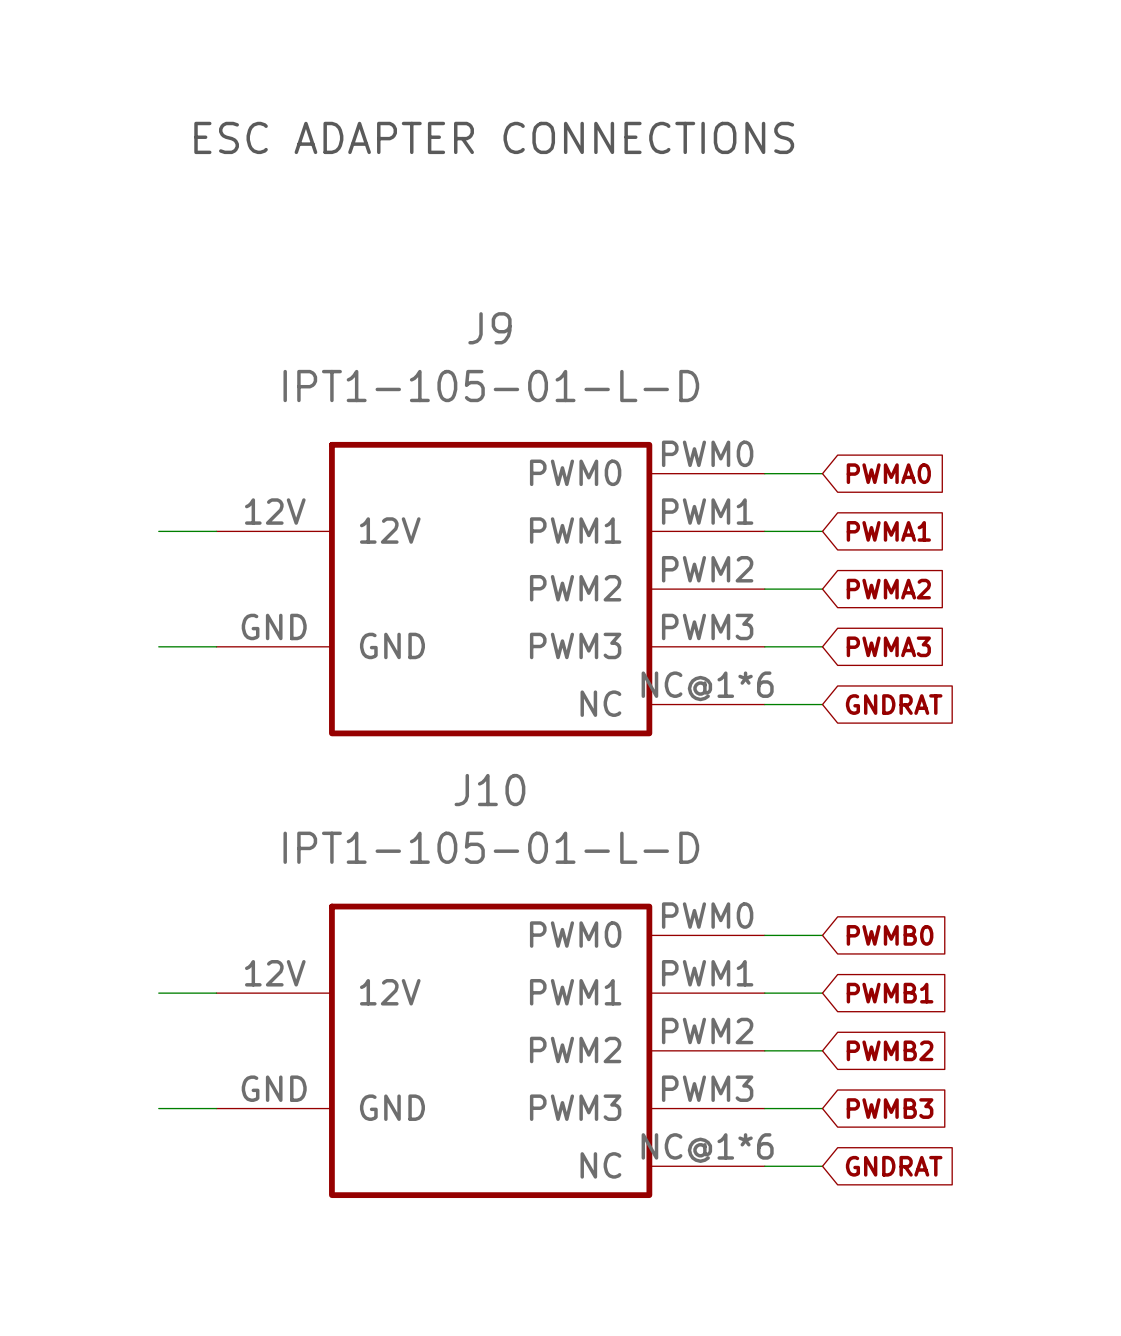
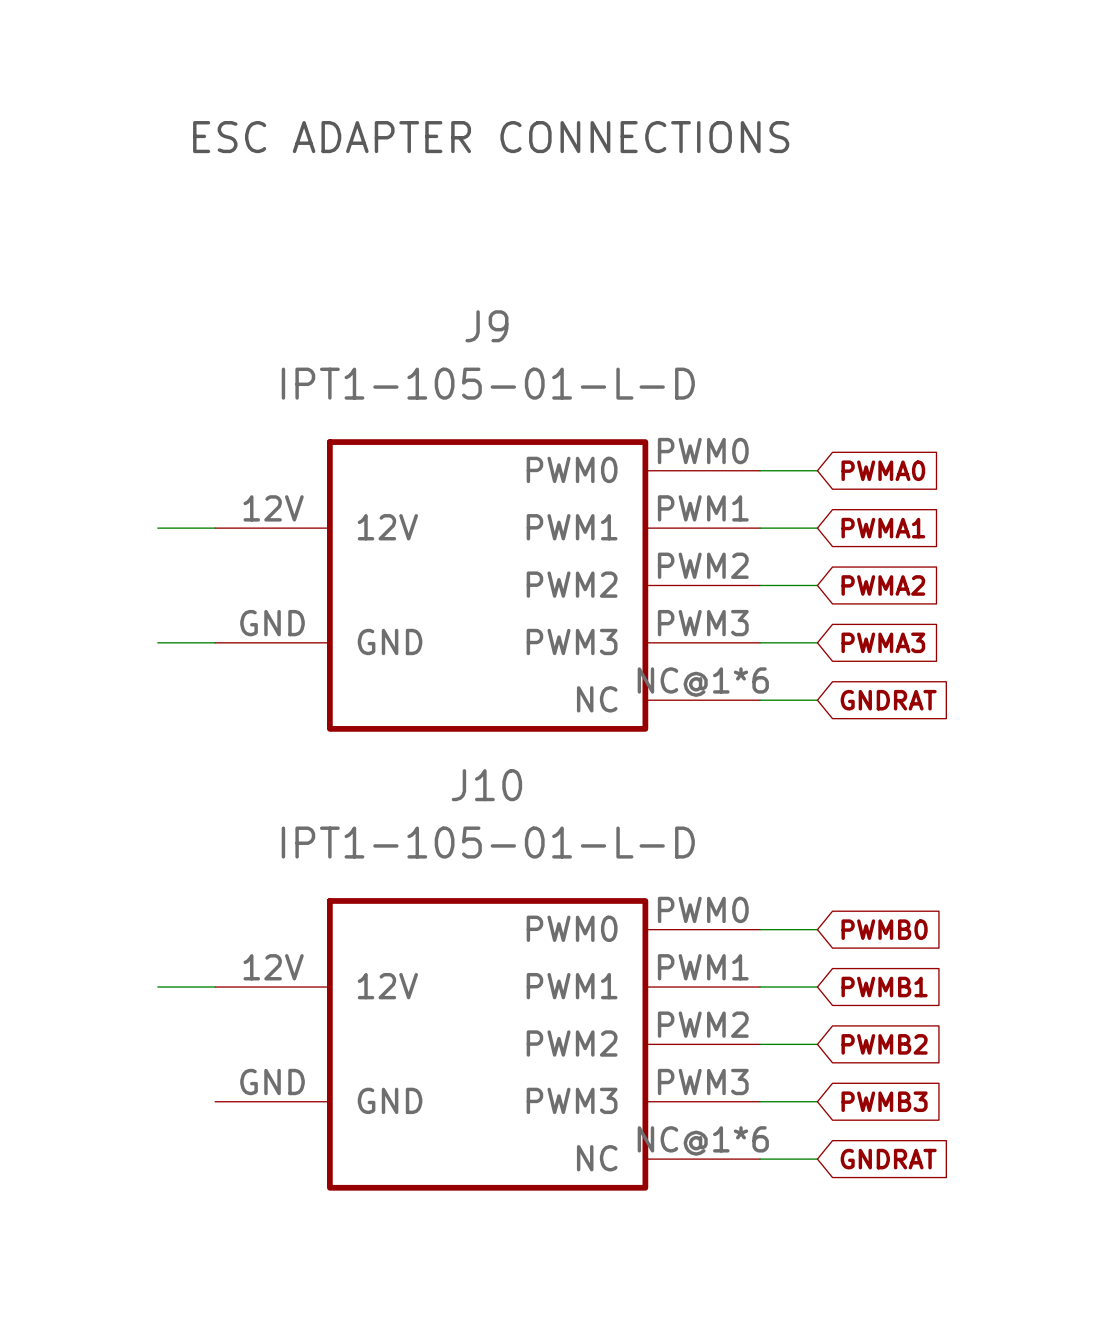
wire: (158, 1108) (216, 1108) -> none

